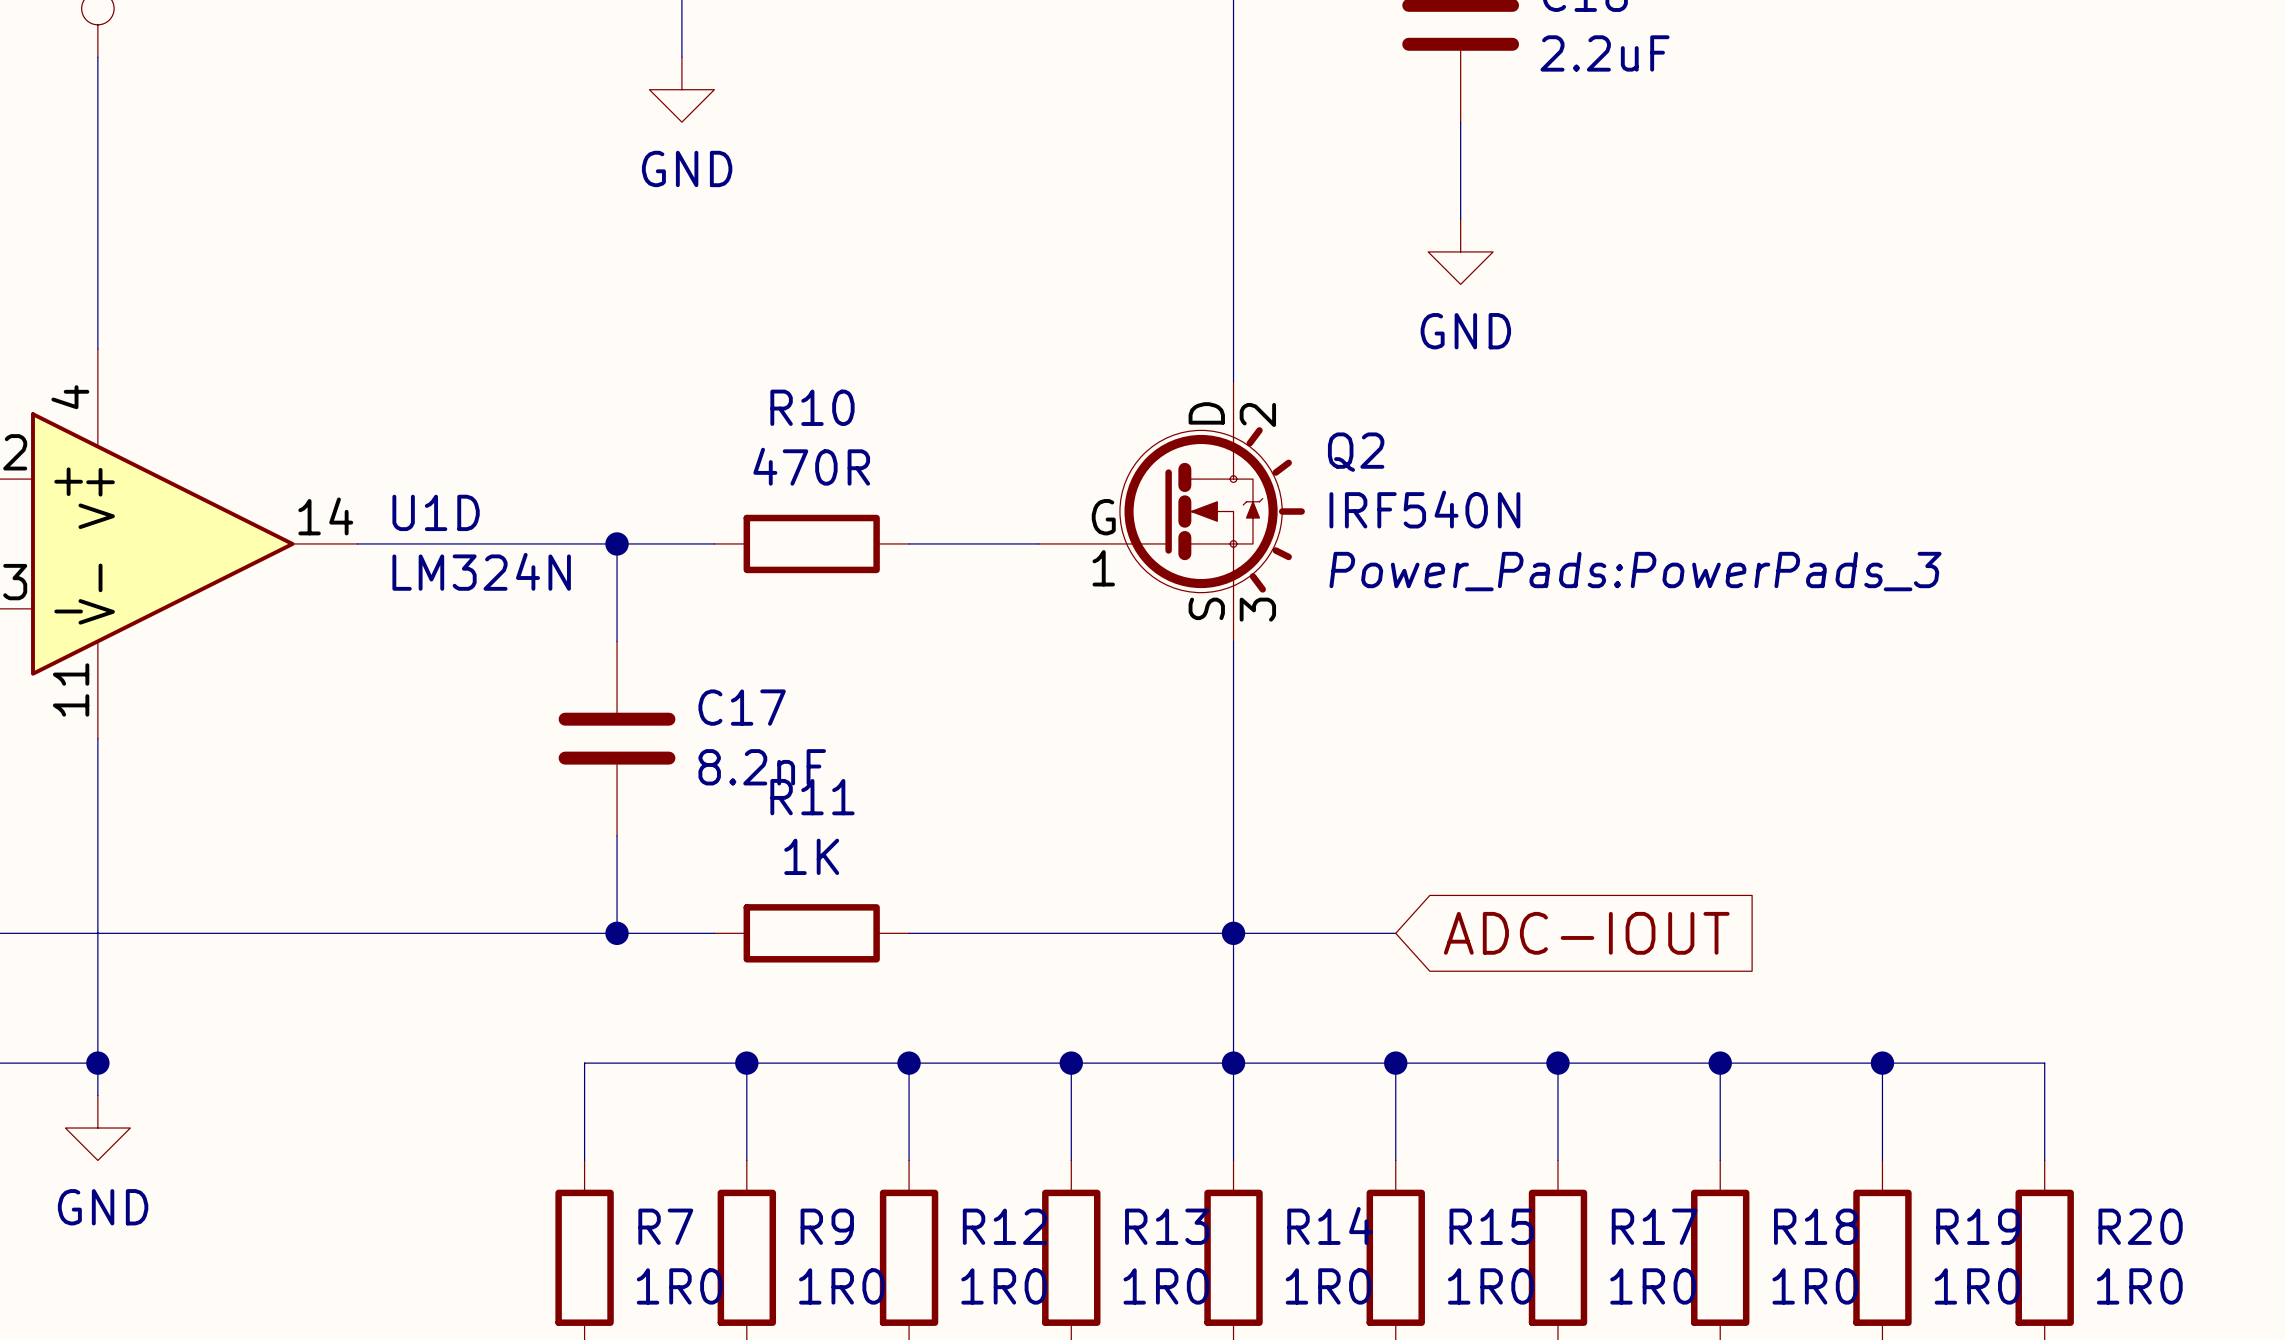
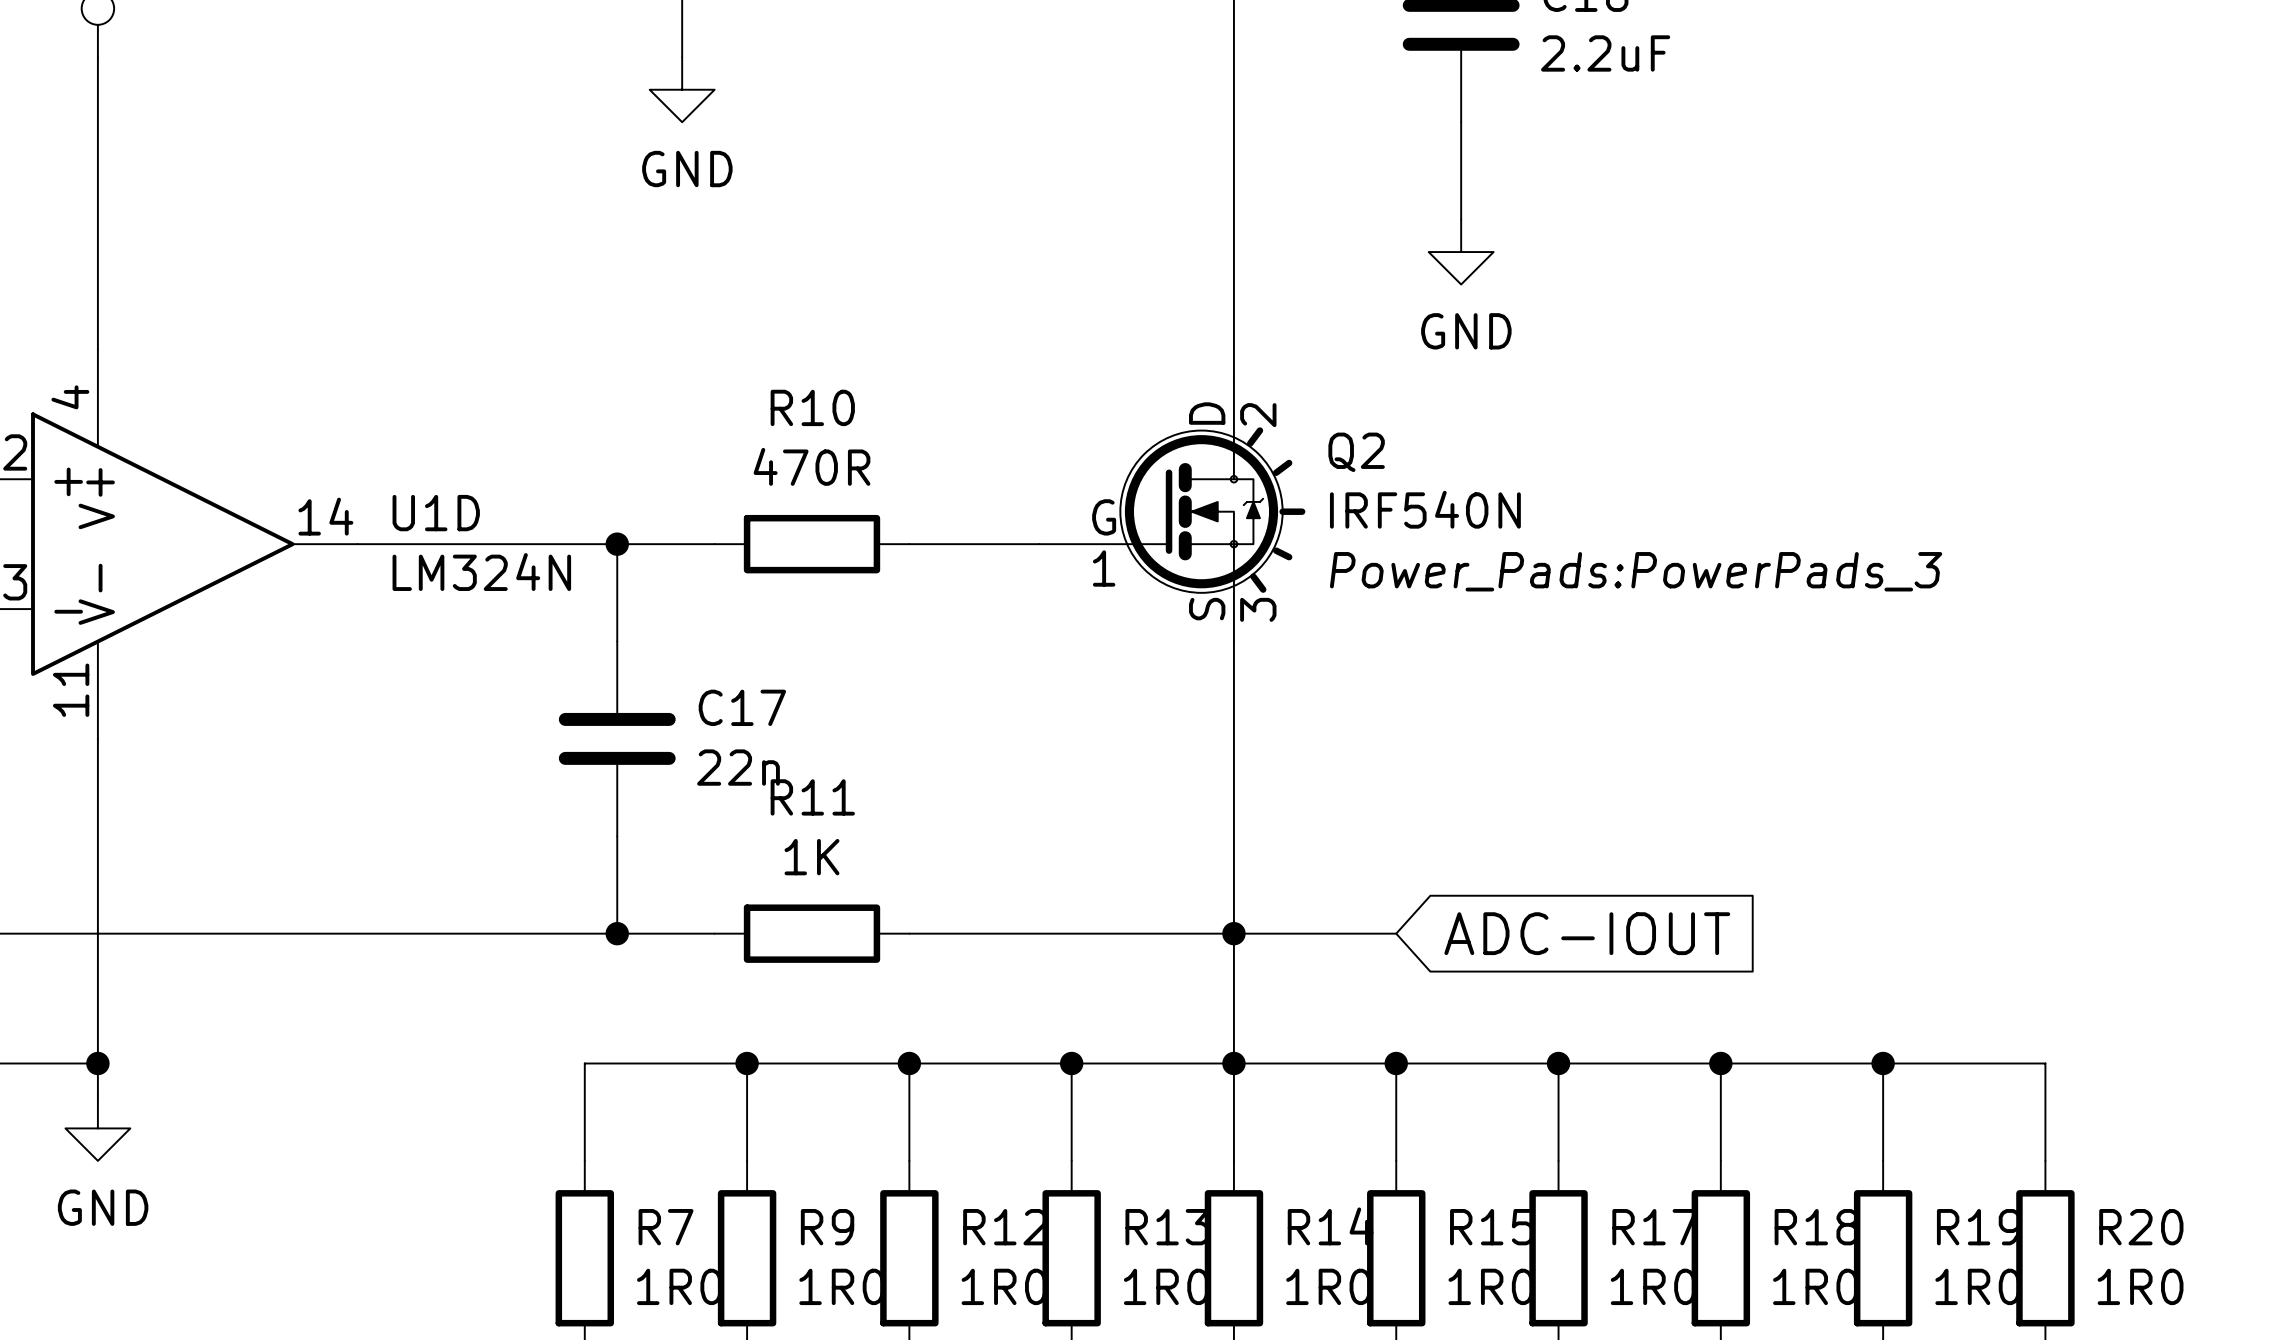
C17 value: 8.2nF (762, 767) -> 22n (738, 767)

